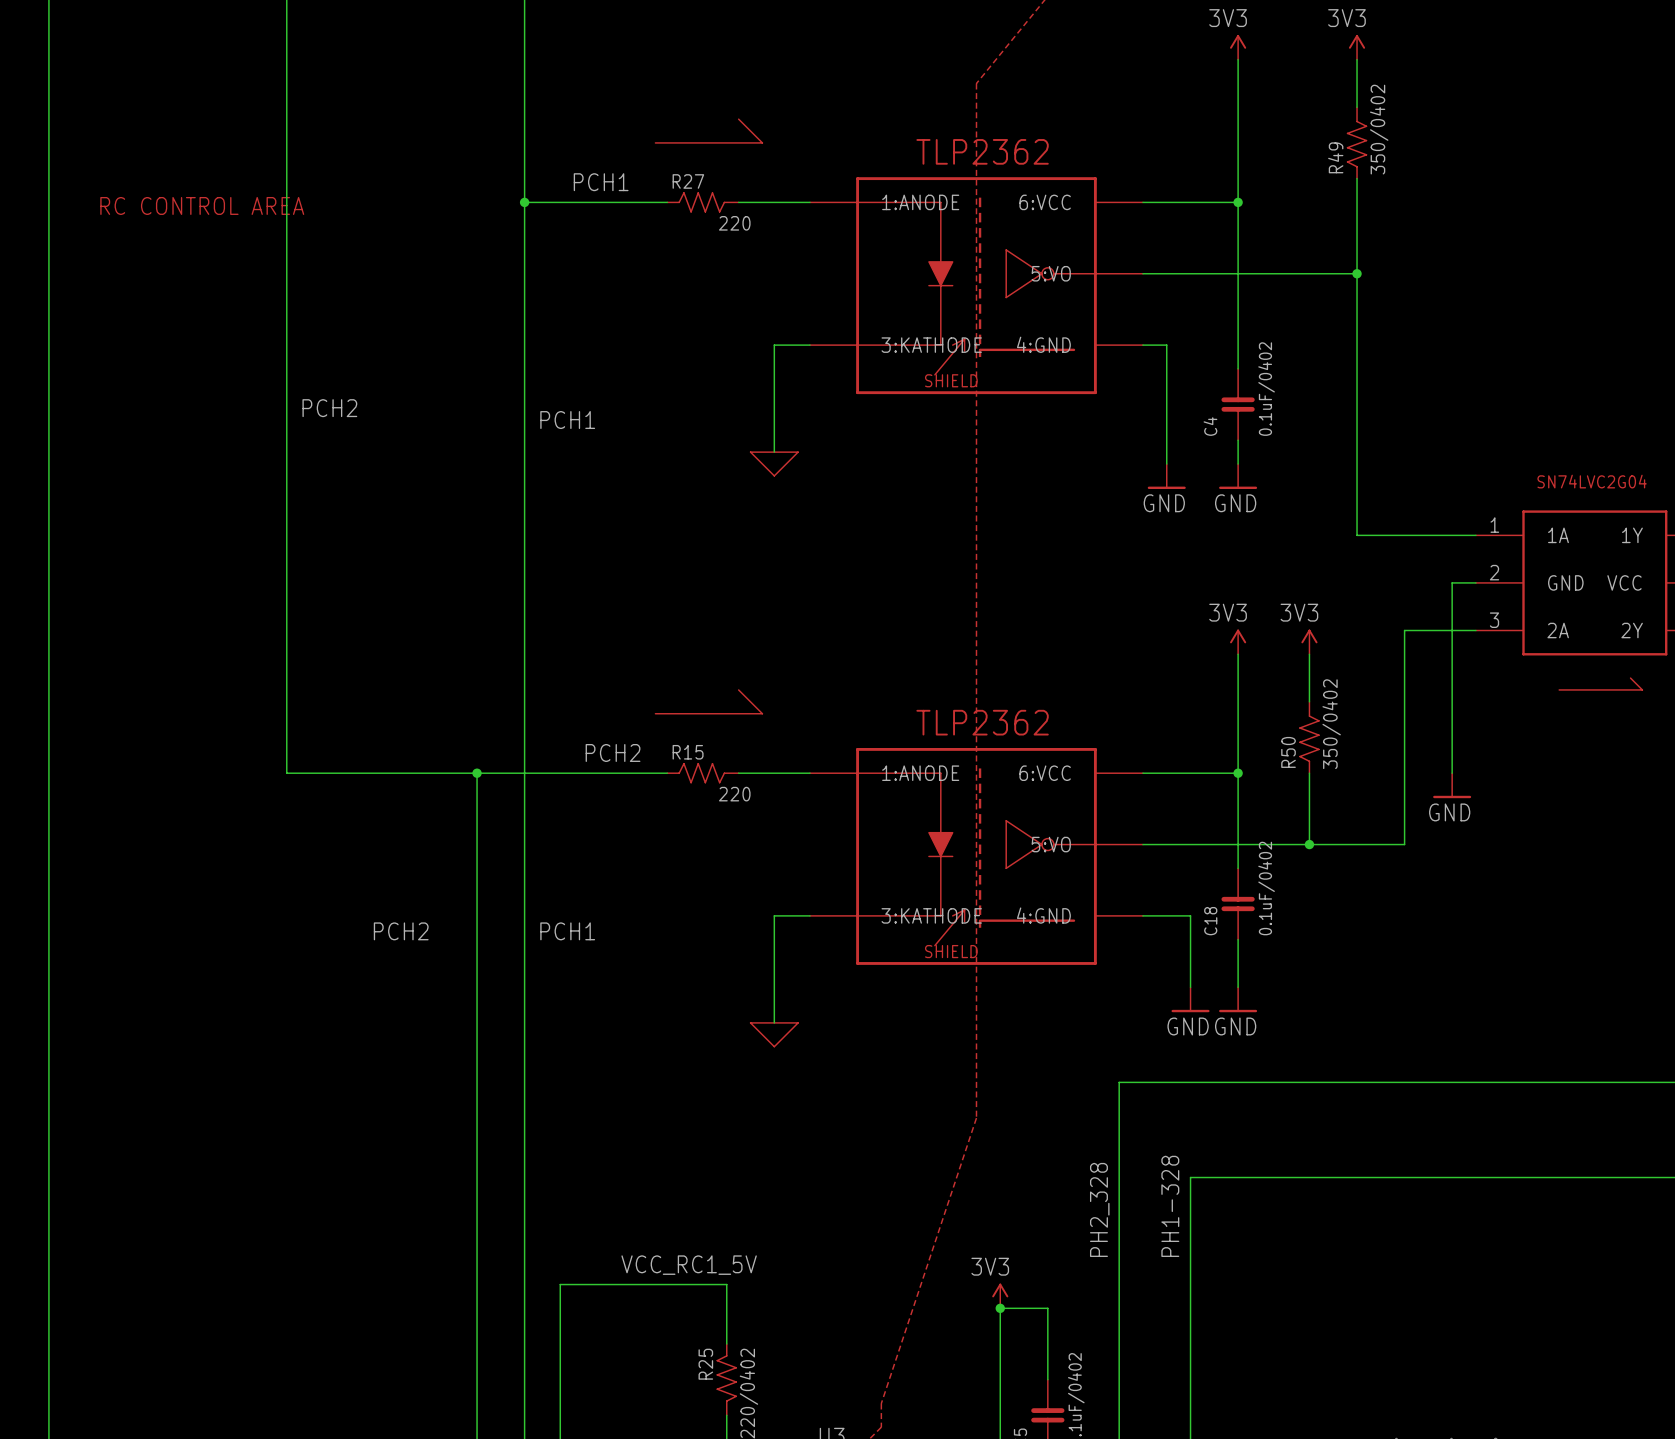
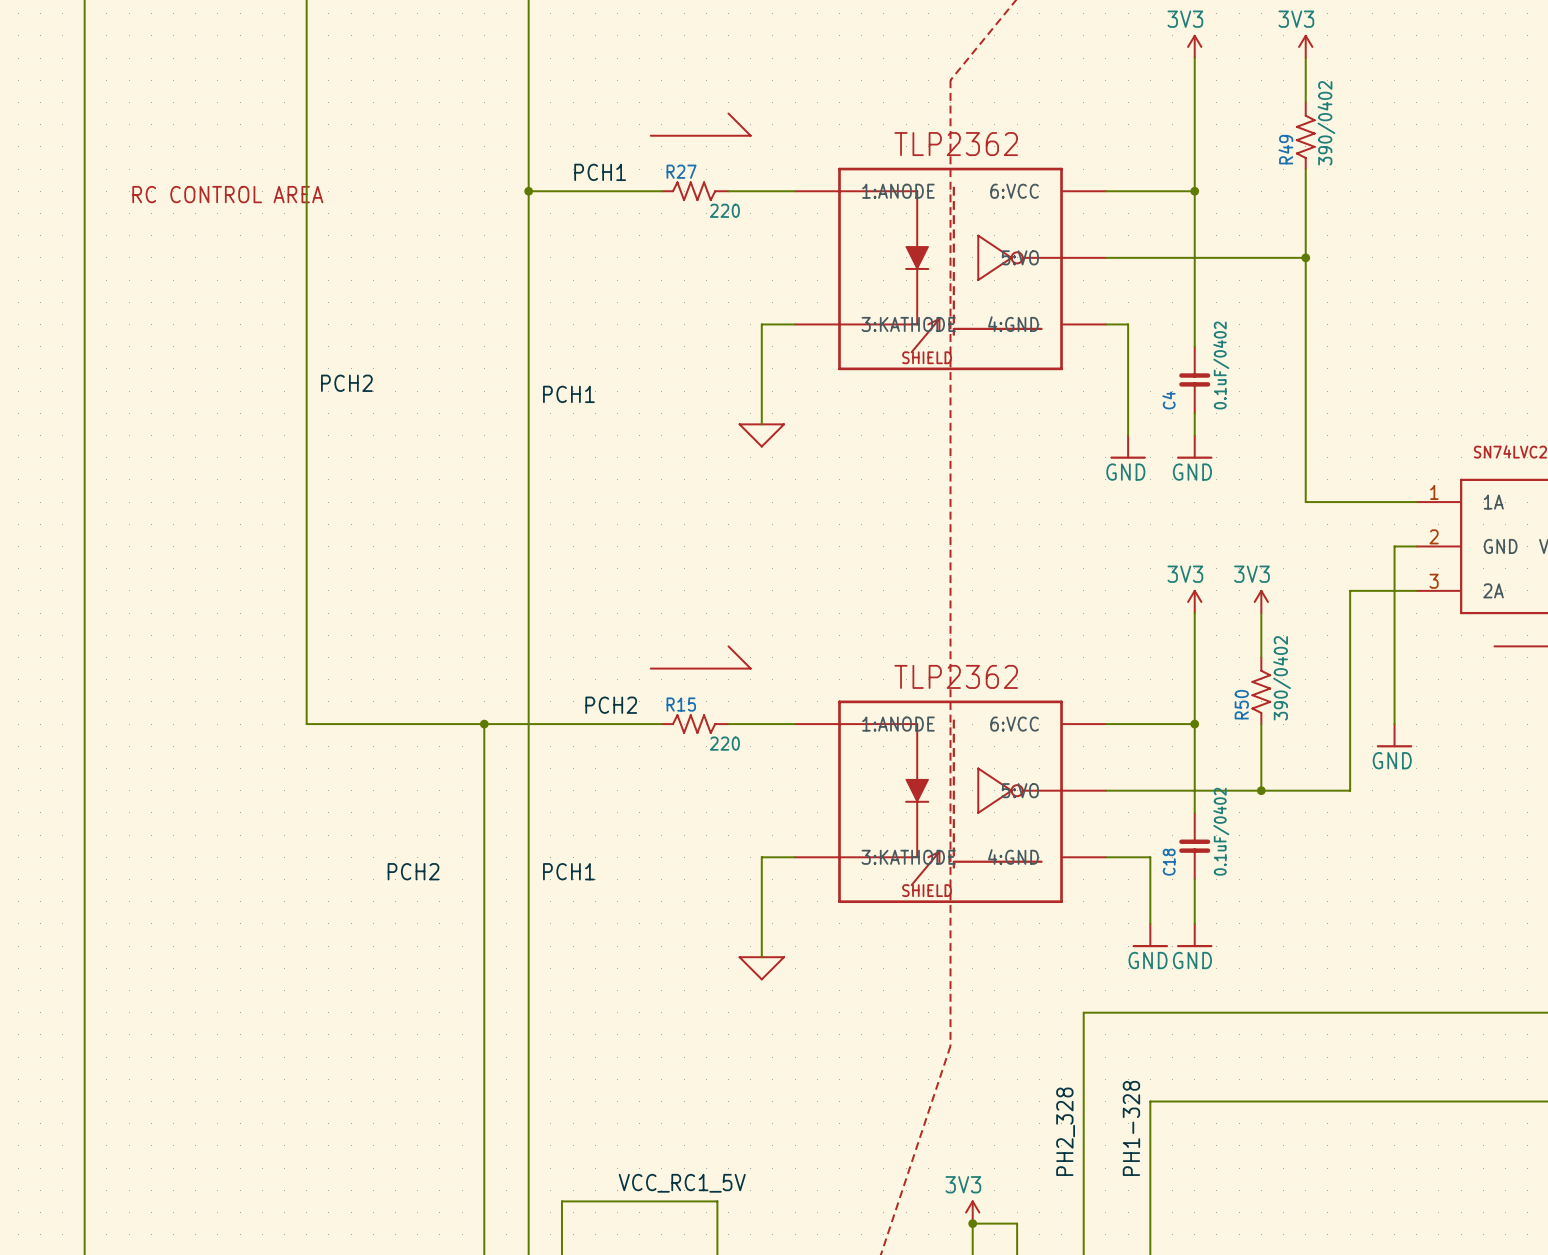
R49 value: 350/0402 (1379, 129) -> 390/0402 (1326, 123)
R50 value: 350/0402 (1331, 724) -> 390/0402 (1282, 678)

